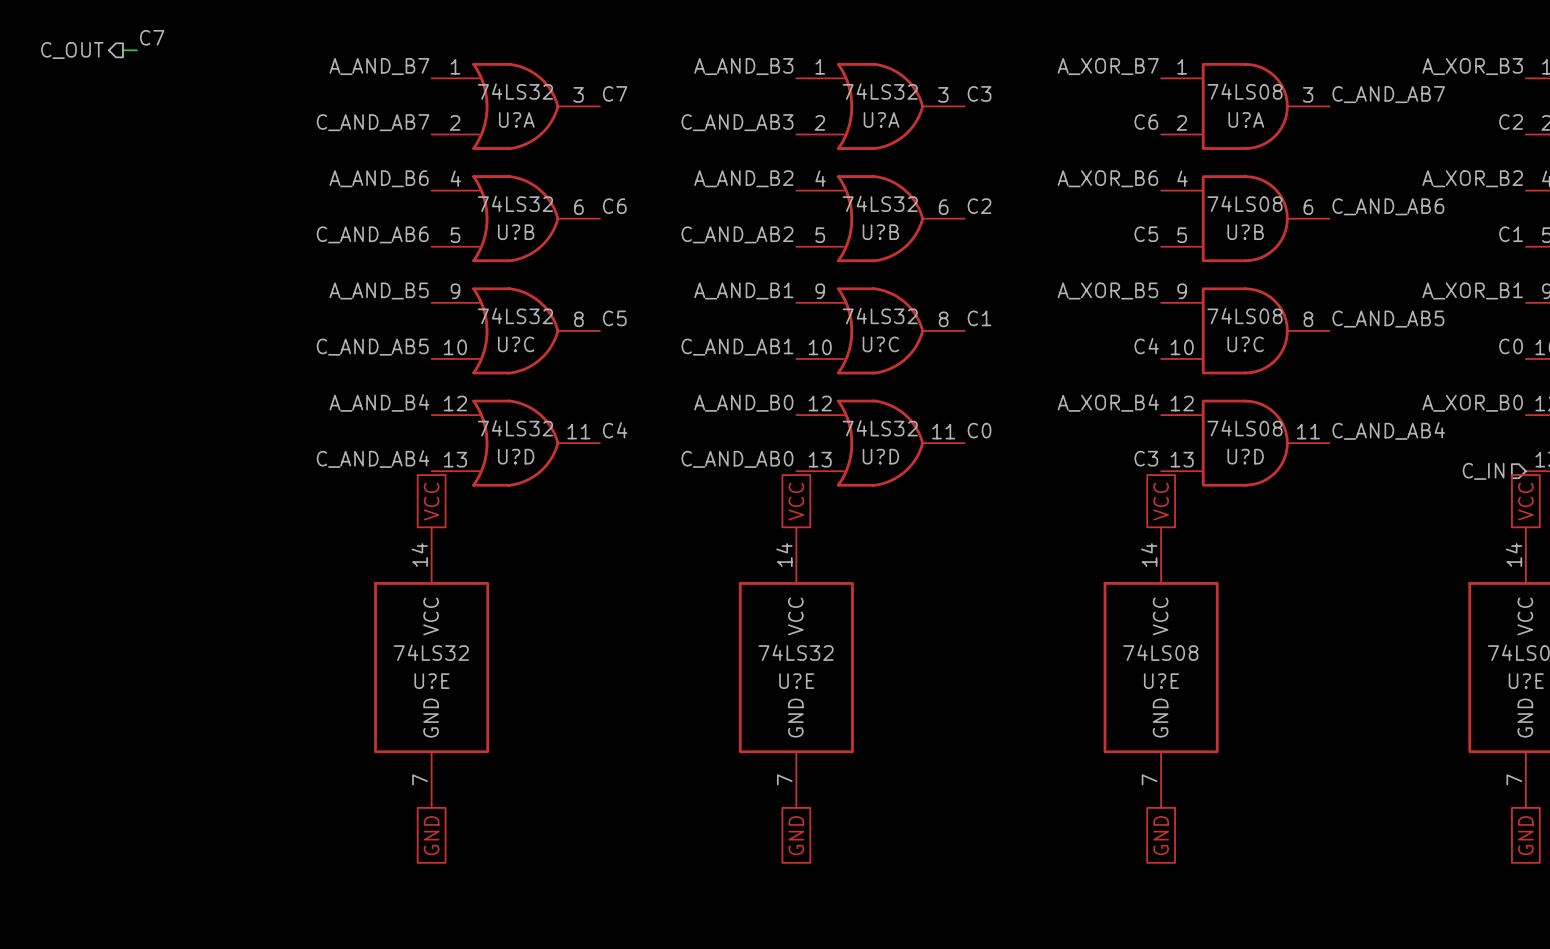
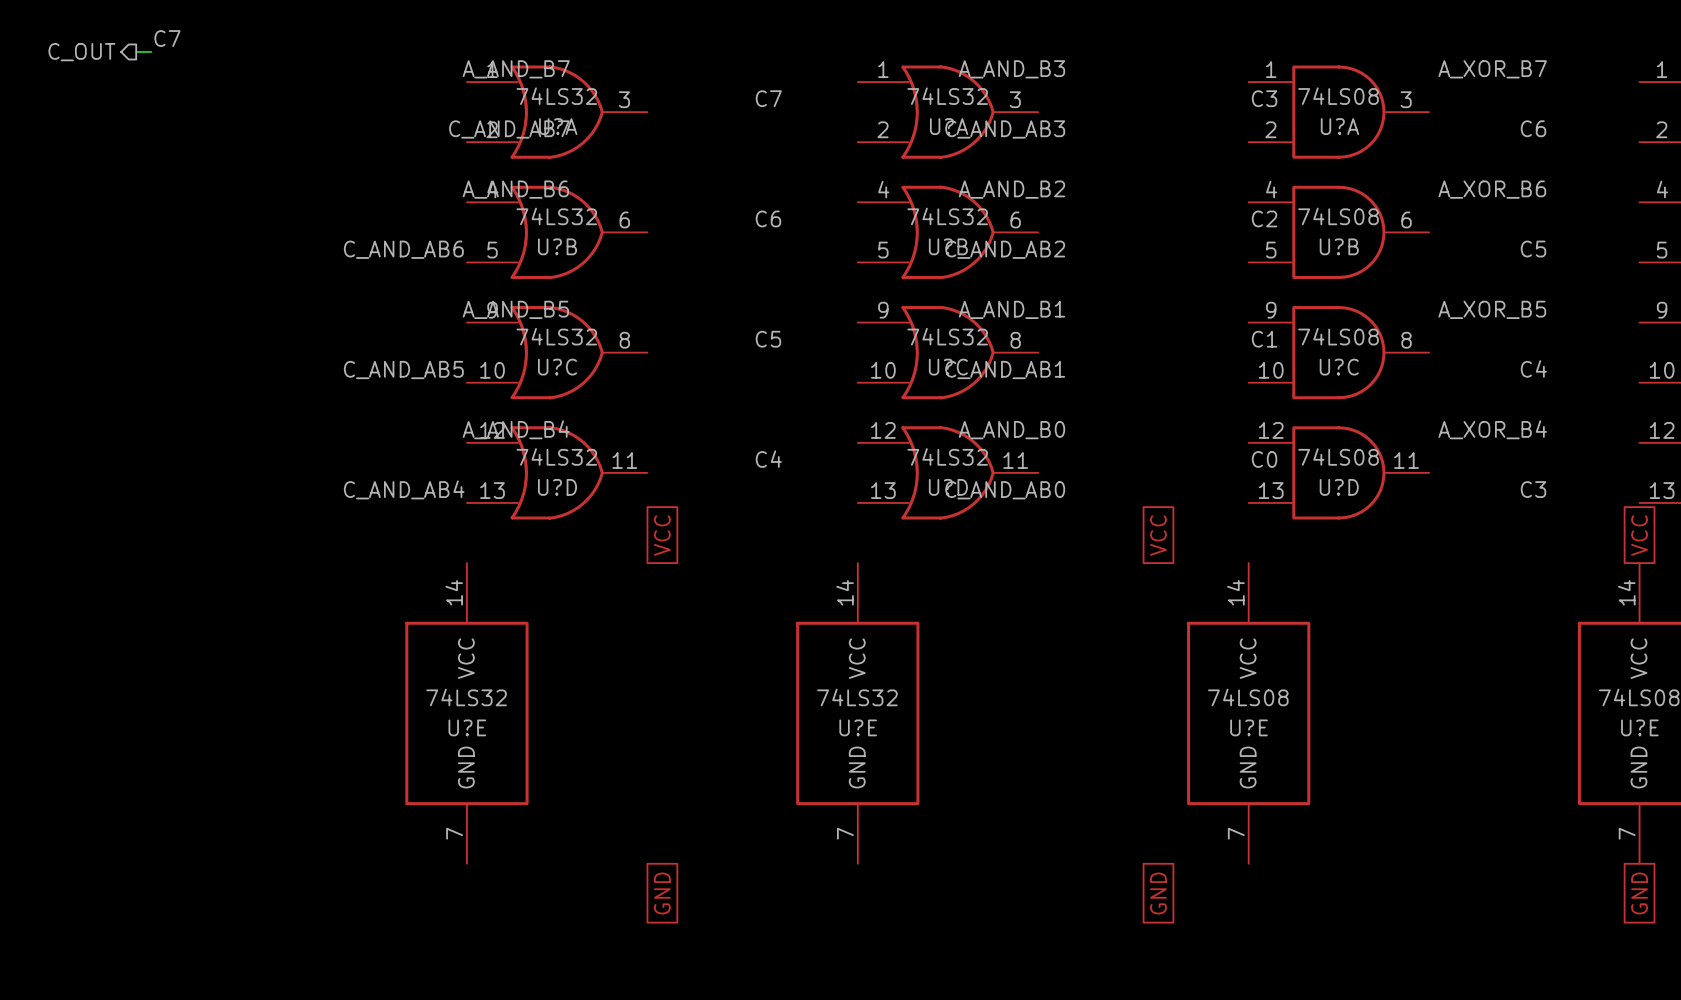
label position: A_AND_B7 (379, 66) -> A_AND_B7 (516, 69)
label position: A_AND_B3 (743, 66) -> A_AND_B3 (1011, 69)
label: A_XOR_B7 (1108, 66) -> none
label: A_XOR_B3 (1472, 66) -> A_XOR_B7 (1492, 69)
label position: C7 (615, 93) -> C7 (768, 98)
label: C3 (979, 93) -> none
label: none -> C3 (1264, 98)
label: C_AND_AB7 (1388, 94) -> none
label: C6 (1146, 121) -> none
label: none -> C6 (1533, 128)
label: C2 (1511, 121) -> none
label position: C_AND_AB7 (373, 122) -> C_AND_AB7 (509, 129)
label position: C_AND_AB3 (737, 122) -> C_AND_AB3 (1005, 129)
label position: A_AND_B6 (379, 178) -> A_AND_B6 (515, 189)
label position: A_AND_B2 (743, 178) -> A_AND_B2 (1011, 189)
label: A_XOR_B6 (1107, 178) -> none
label: A_XOR_B2 (1472, 178) -> A_XOR_B6 (1492, 189)
label position: C6 (614, 206) -> C6 (768, 218)
label: C2 (979, 206) -> none
label: none -> C2 (1264, 218)
label: C_AND_AB6 (1388, 206) -> none
label position: C_AND_AB2 (737, 234) -> C_AND_AB2 (1005, 249)
label: C5 (1146, 234) -> none
label: none -> C5 (1533, 249)
label: C1 (1511, 234) -> none
label position: A_AND_B5 (379, 291) -> A_AND_B5 (515, 309)
label position: A_AND_B1 (743, 291) -> A_AND_B1 (1011, 309)
label: A_XOR_B5 (1107, 291) -> none
label: A_XOR_B1 (1472, 291) -> A_XOR_B5 (1492, 309)
label position: C5 (614, 318) -> C5 (768, 339)
label: C1 (979, 318) -> none
label: none -> C1 (1264, 339)
label: C_AND_AB5 (1388, 319) -> none
label: C4 (1146, 346) -> none
label: none -> C4 (1533, 368)
label: C0 (1511, 346) -> none
label position: C_AND_AB1 (737, 347) -> C_AND_AB1 (1005, 370)
label position: A_AND_B4 (379, 402) -> A_AND_B4 (516, 429)
label: A_XOR_B4 (1108, 402) -> none
label position: A_AND_B0 (743, 403) -> A_AND_B0 (1011, 430)
label: A_XOR_B0 (1472, 403) -> A_XOR_B4 (1492, 429)
label position: C4 (615, 430) -> C4 (768, 459)
label: C0 (979, 430) -> none
label: none -> C0 (1264, 459)
label: C_AND_AB4 (1388, 430) -> none
label: C3 (1146, 458) -> none
label: none -> C3 (1533, 489)
label position: C_AND_AB0 (737, 459) -> C_AND_AB0 (1005, 490)
hierarchical label: C_IN (1483, 471) -> none
global label: VCC (431, 501) -> none
global label: none -> VCC (662, 535)
global label: VCC (796, 501) -> none
global label position: VCC (1161, 501) -> VCC (1158, 535)
global label: GND (431, 835) -> none
global label: none -> GND (662, 893)
global label: GND (796, 835) -> none
global label position: GND (1161, 835) -> GND (1158, 893)

